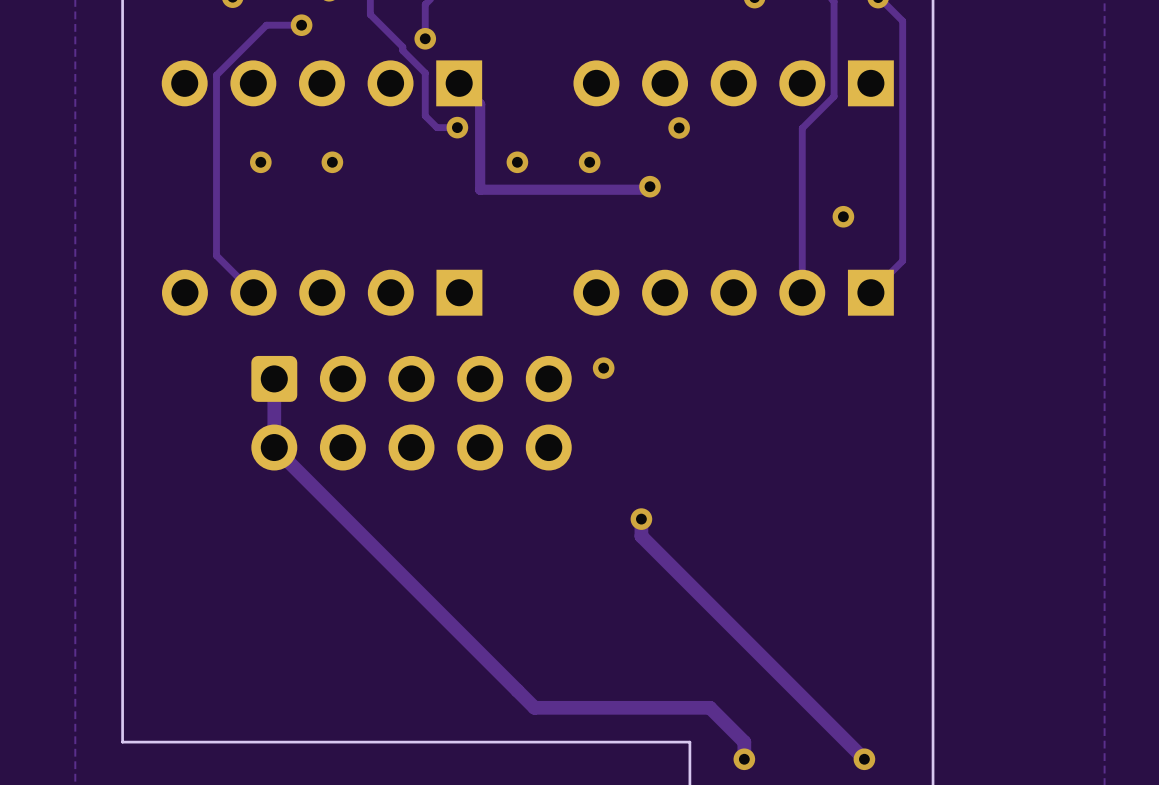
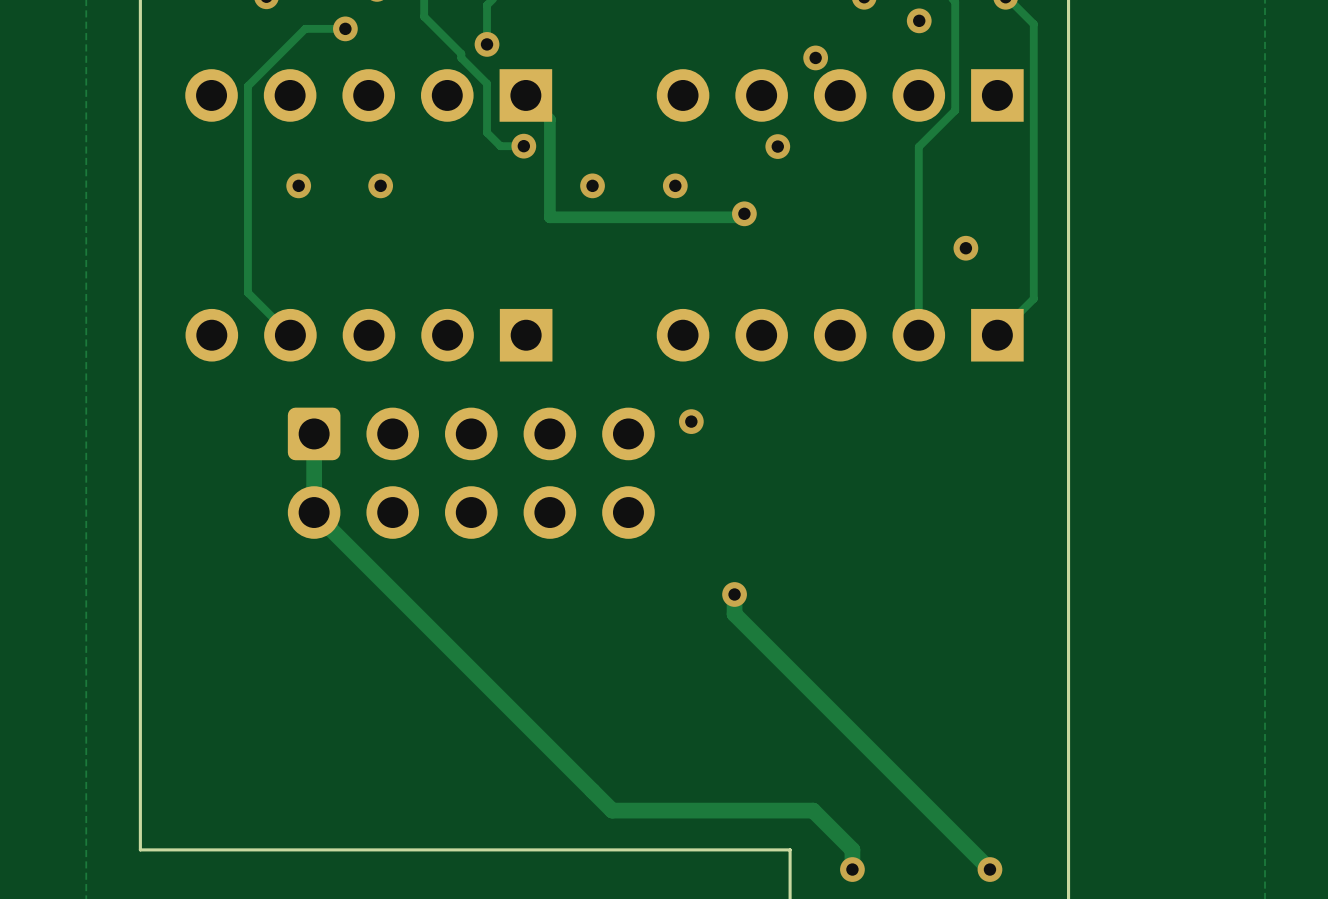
via: none -> (919, 20)
via: none -> (815, 57)

